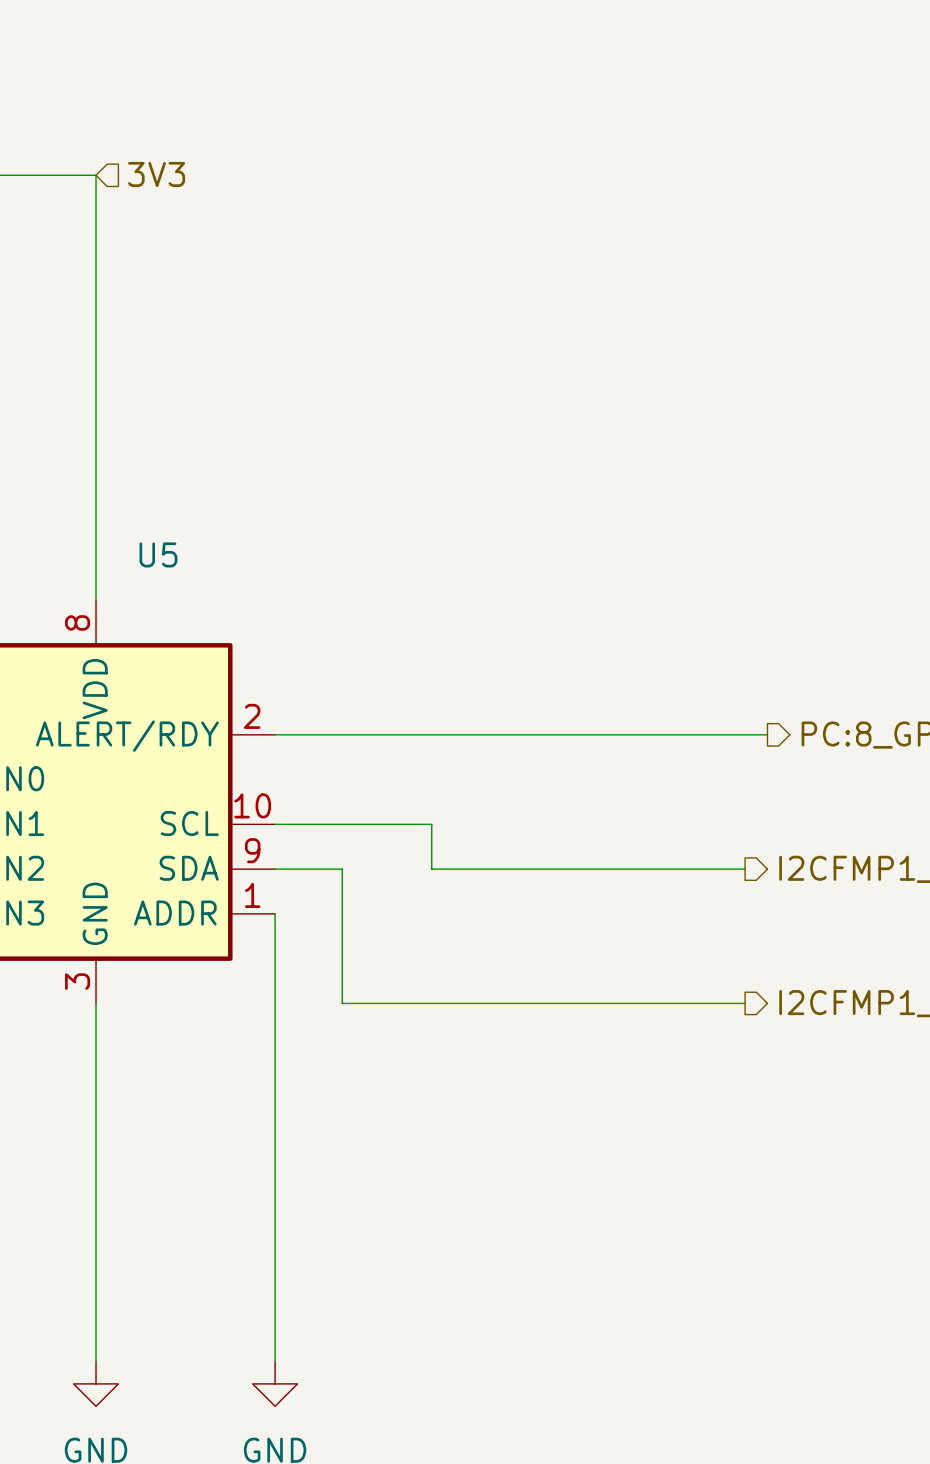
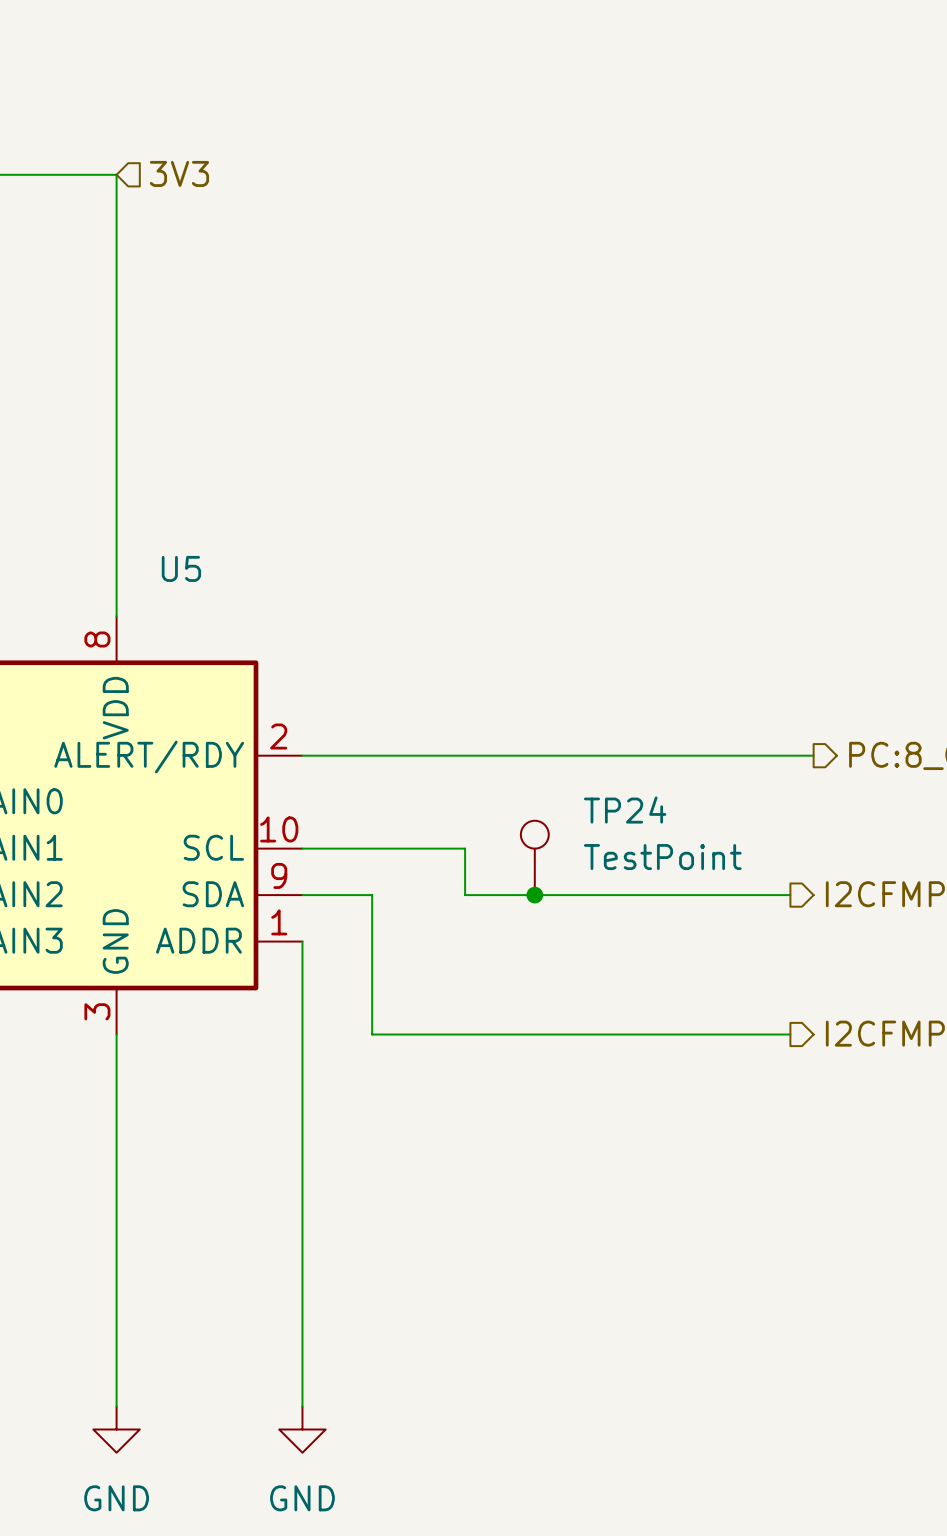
TP24: none -> TestPoint (534, 857)
junction: none -> (534, 895)

